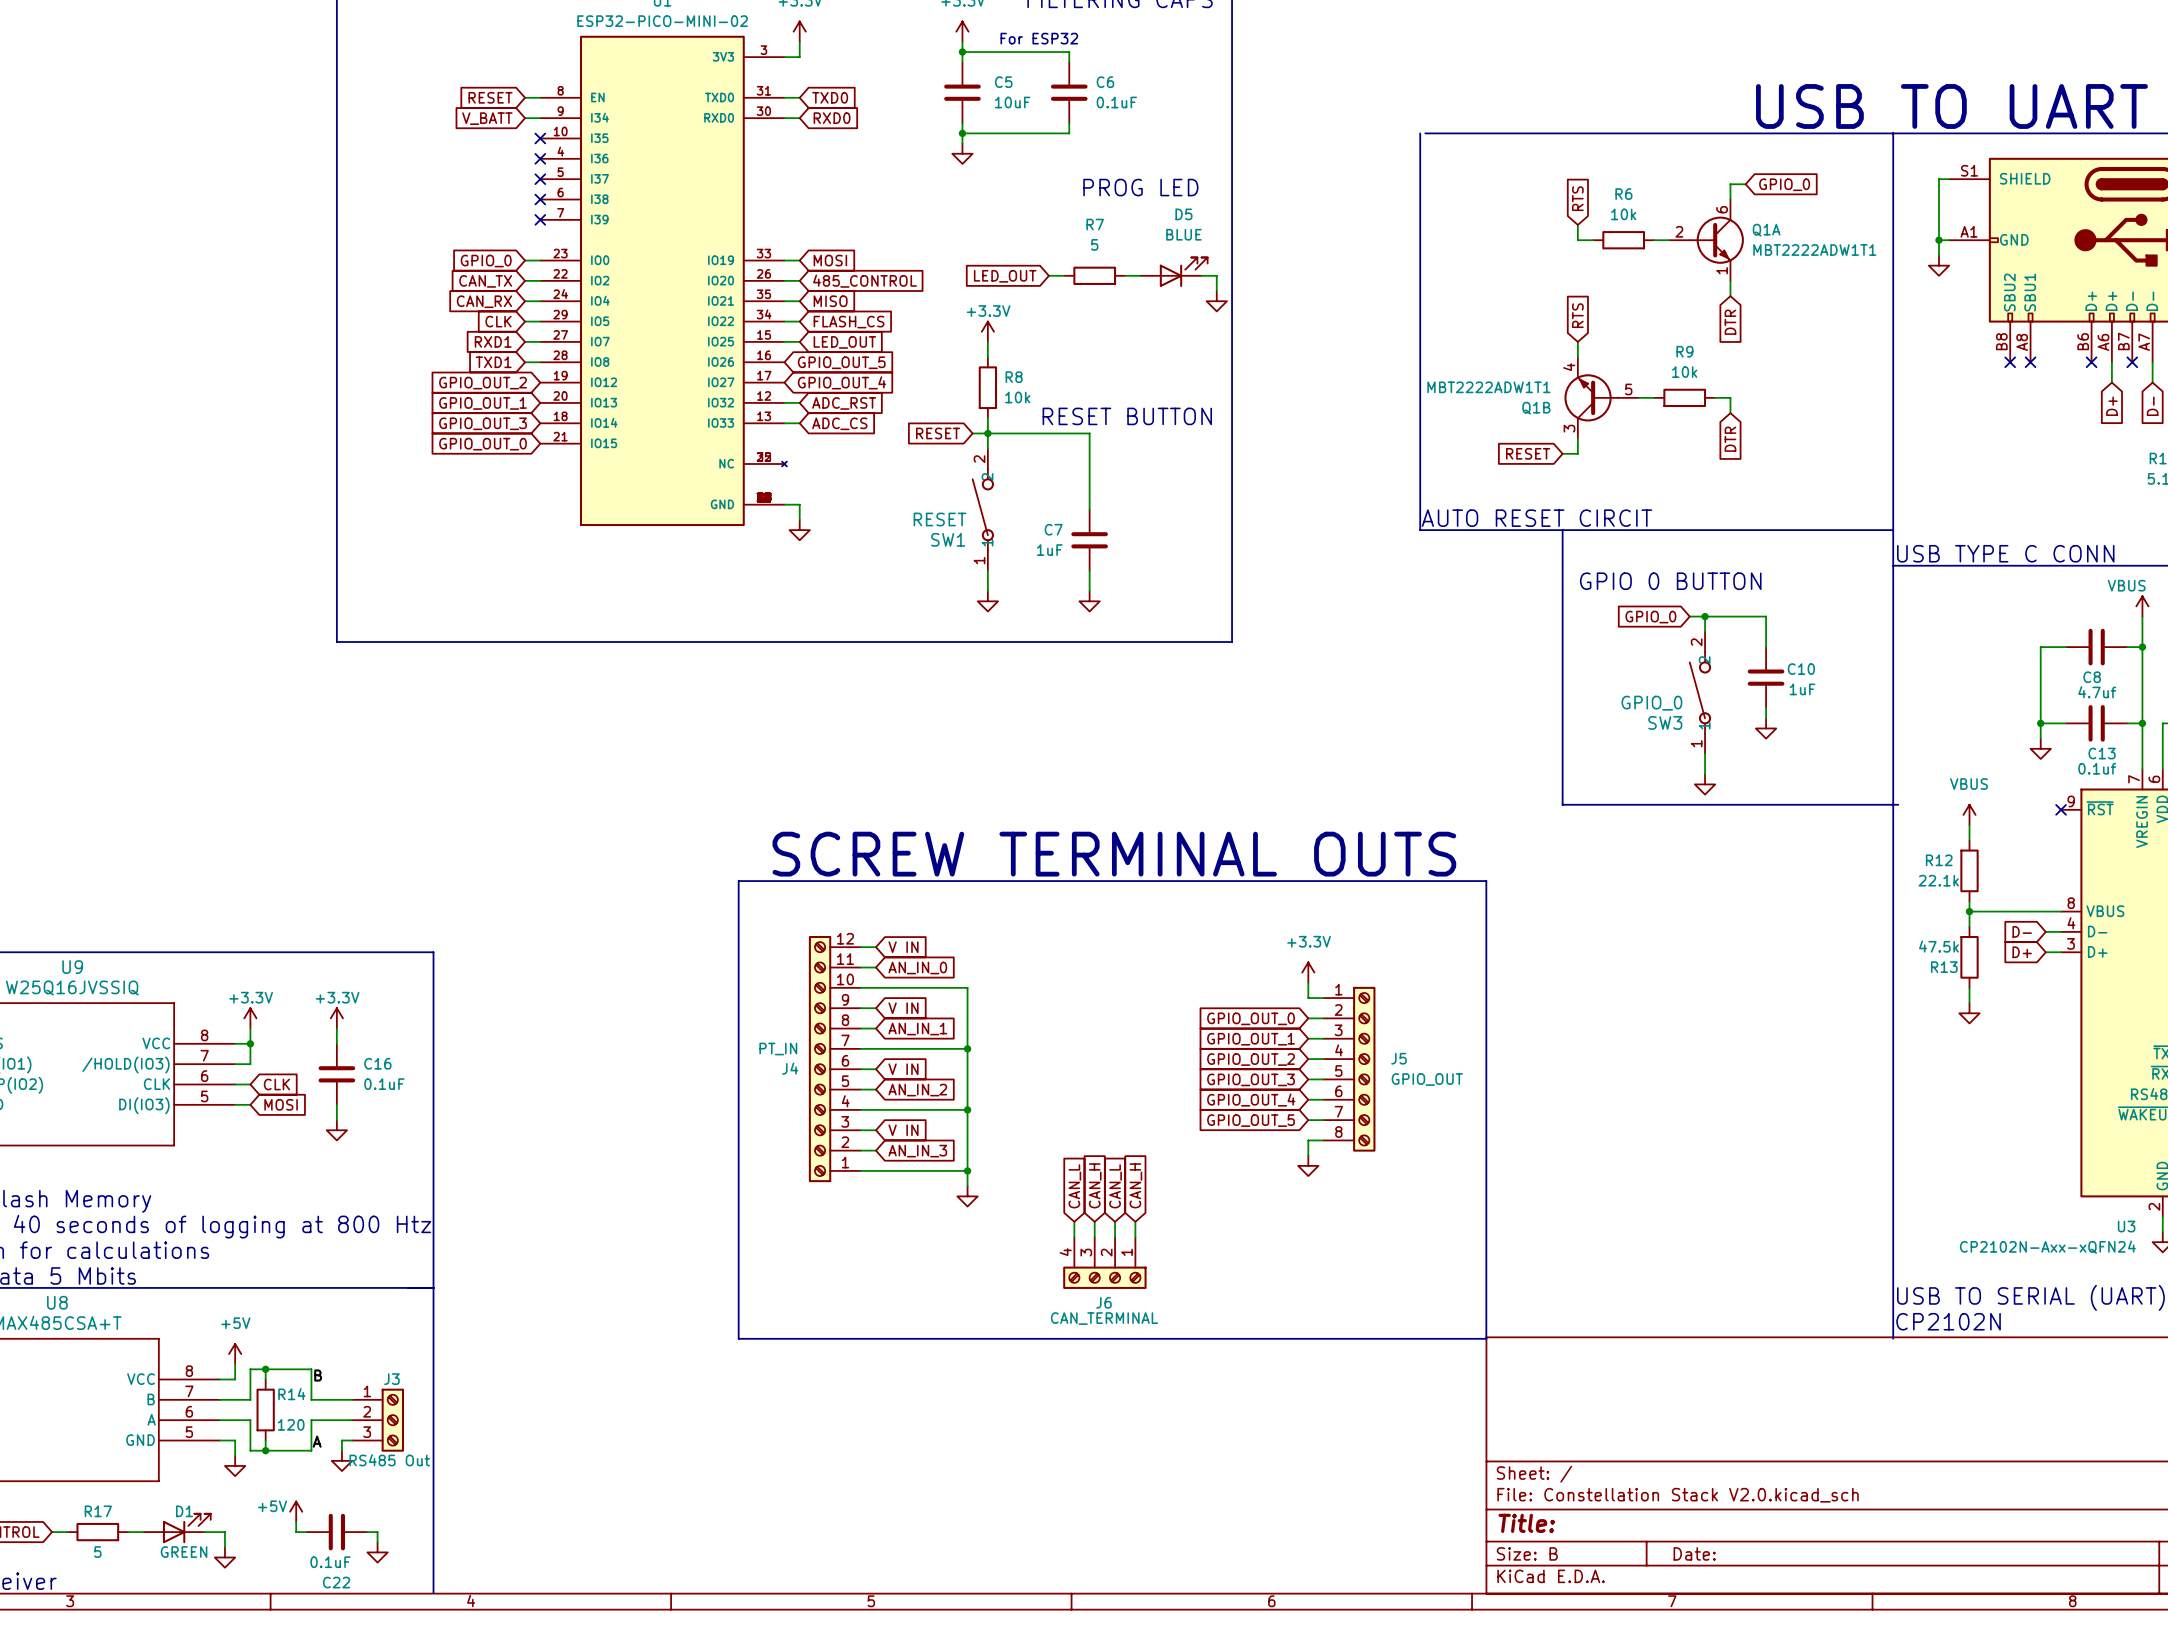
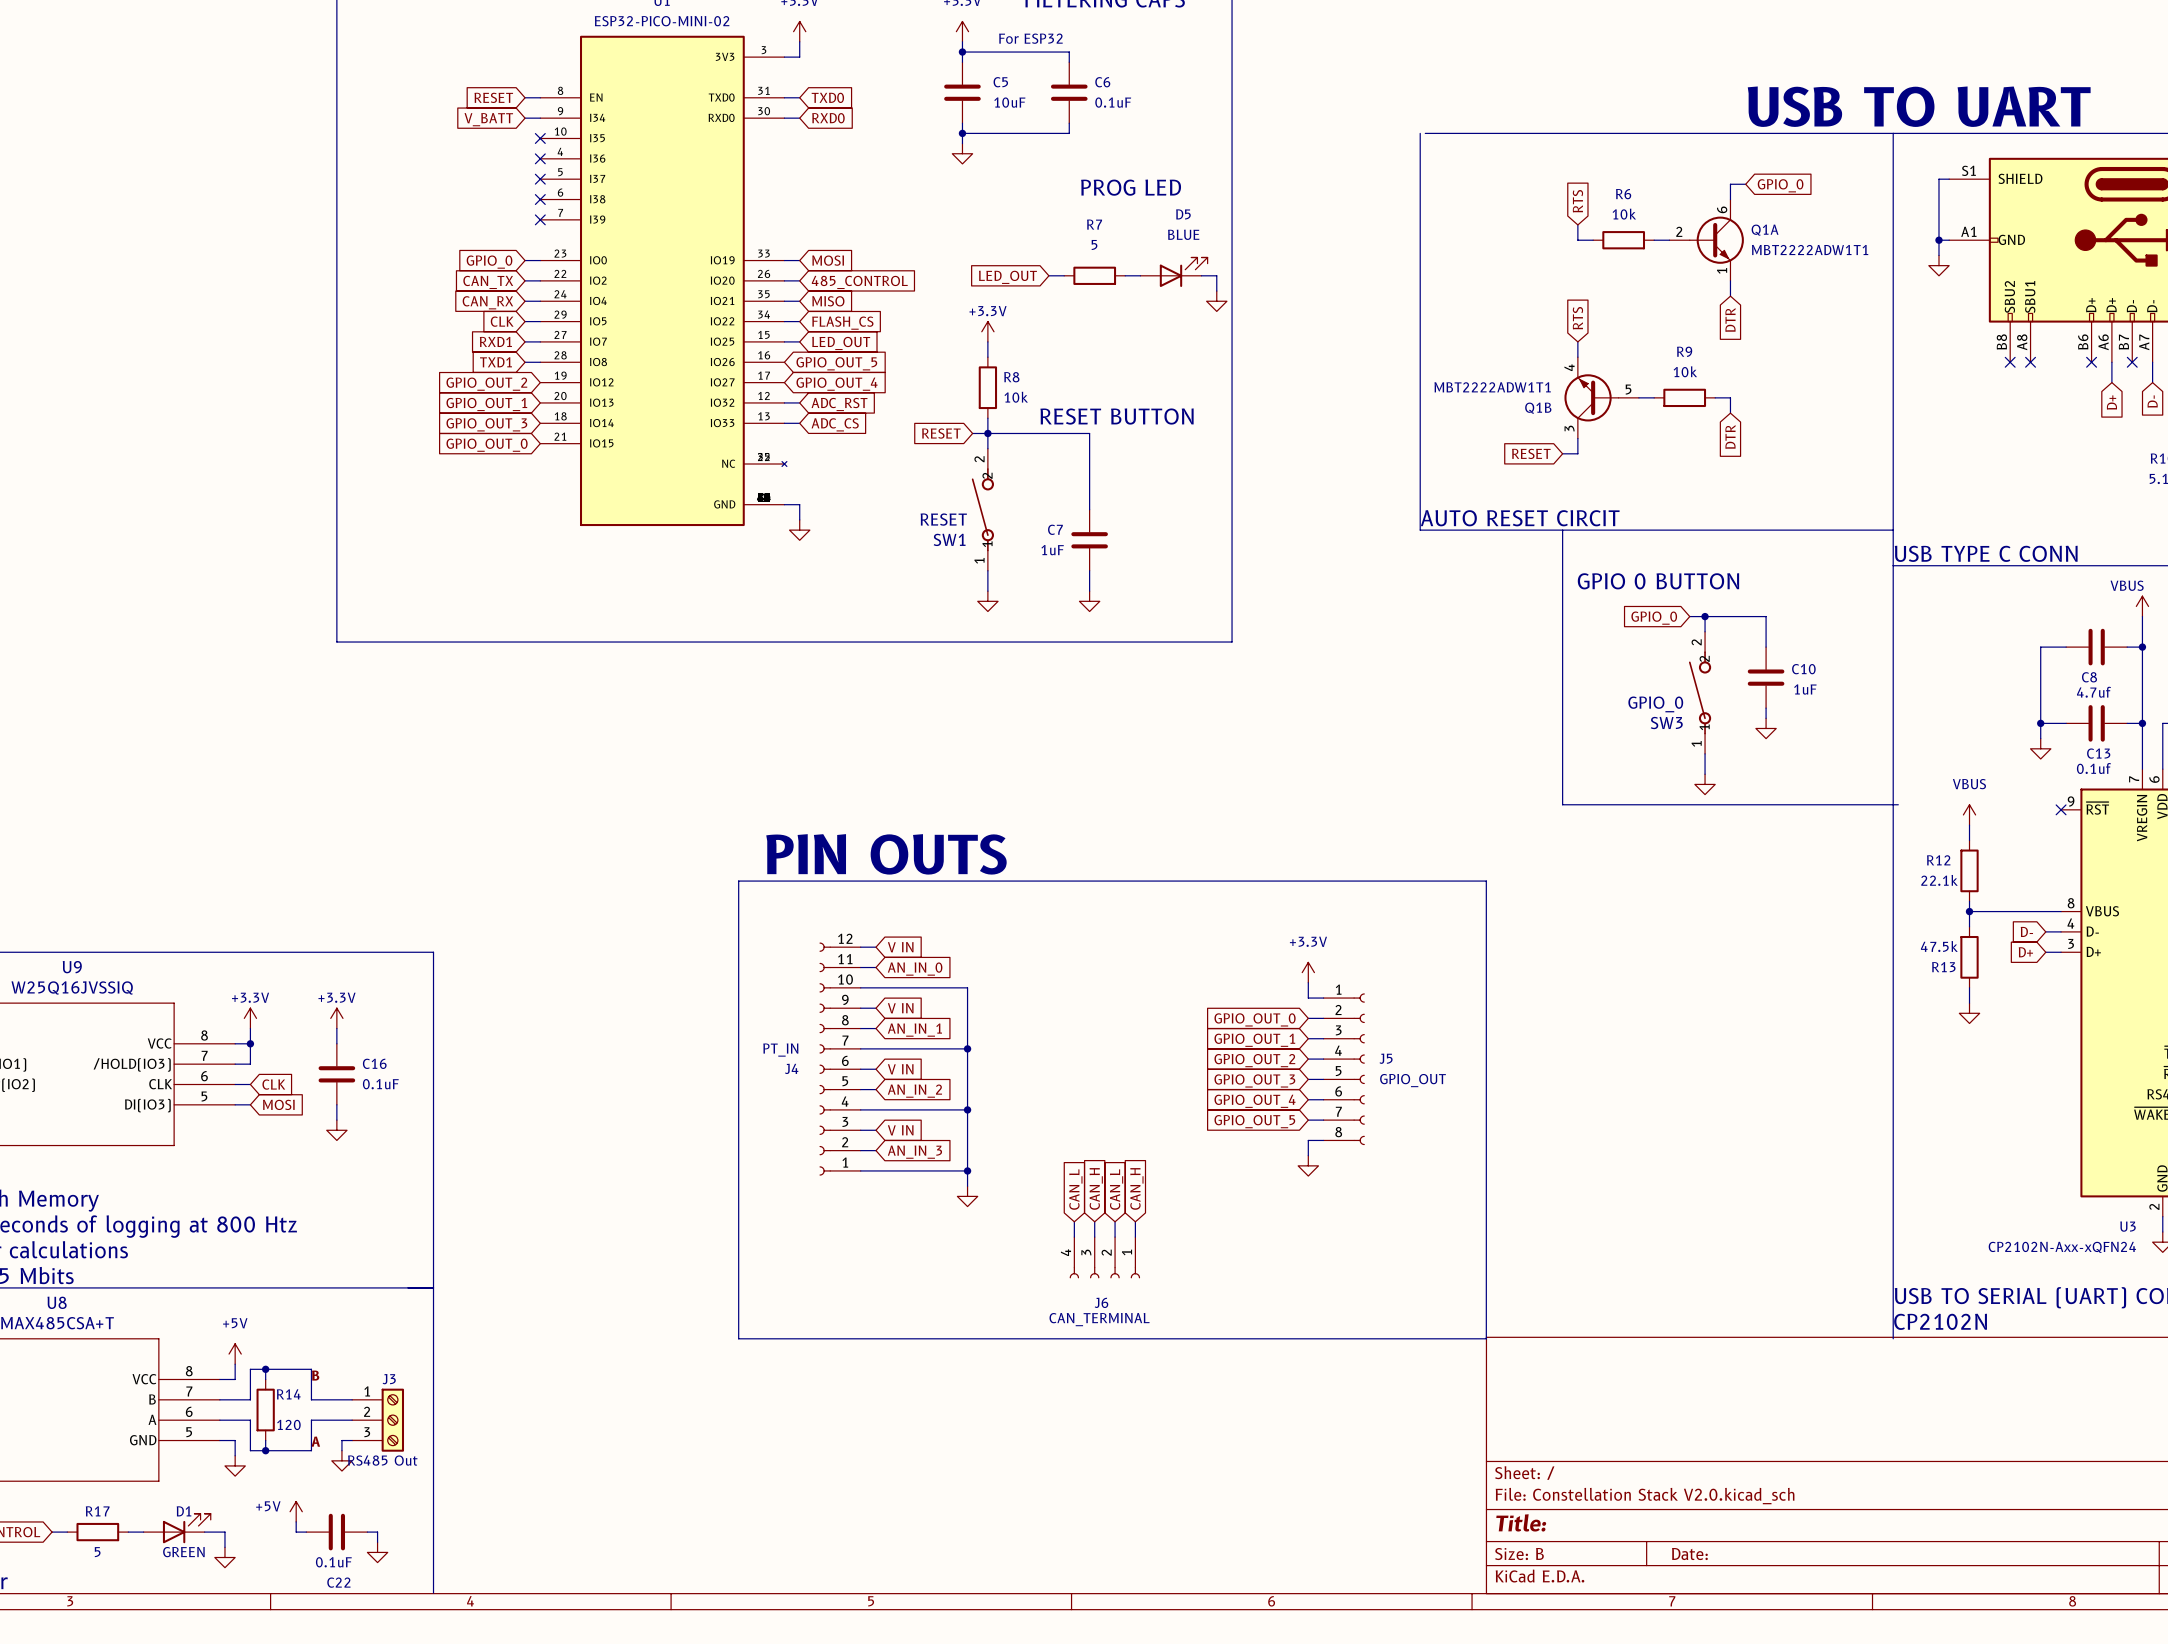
text: SCREW TERMINAL OUTS (1114, 854) -> PIN OUTS (886, 854)
J4 symbol: [808, 935, 861, 1183] -> [819, 942, 861, 1176]
J5 symbol: [1323, 986, 1376, 1152] -> [1323, 993, 1365, 1146]
J6 symbol: [1063, 1237, 1147, 1289] -> [1069, 1237, 1141, 1279]

